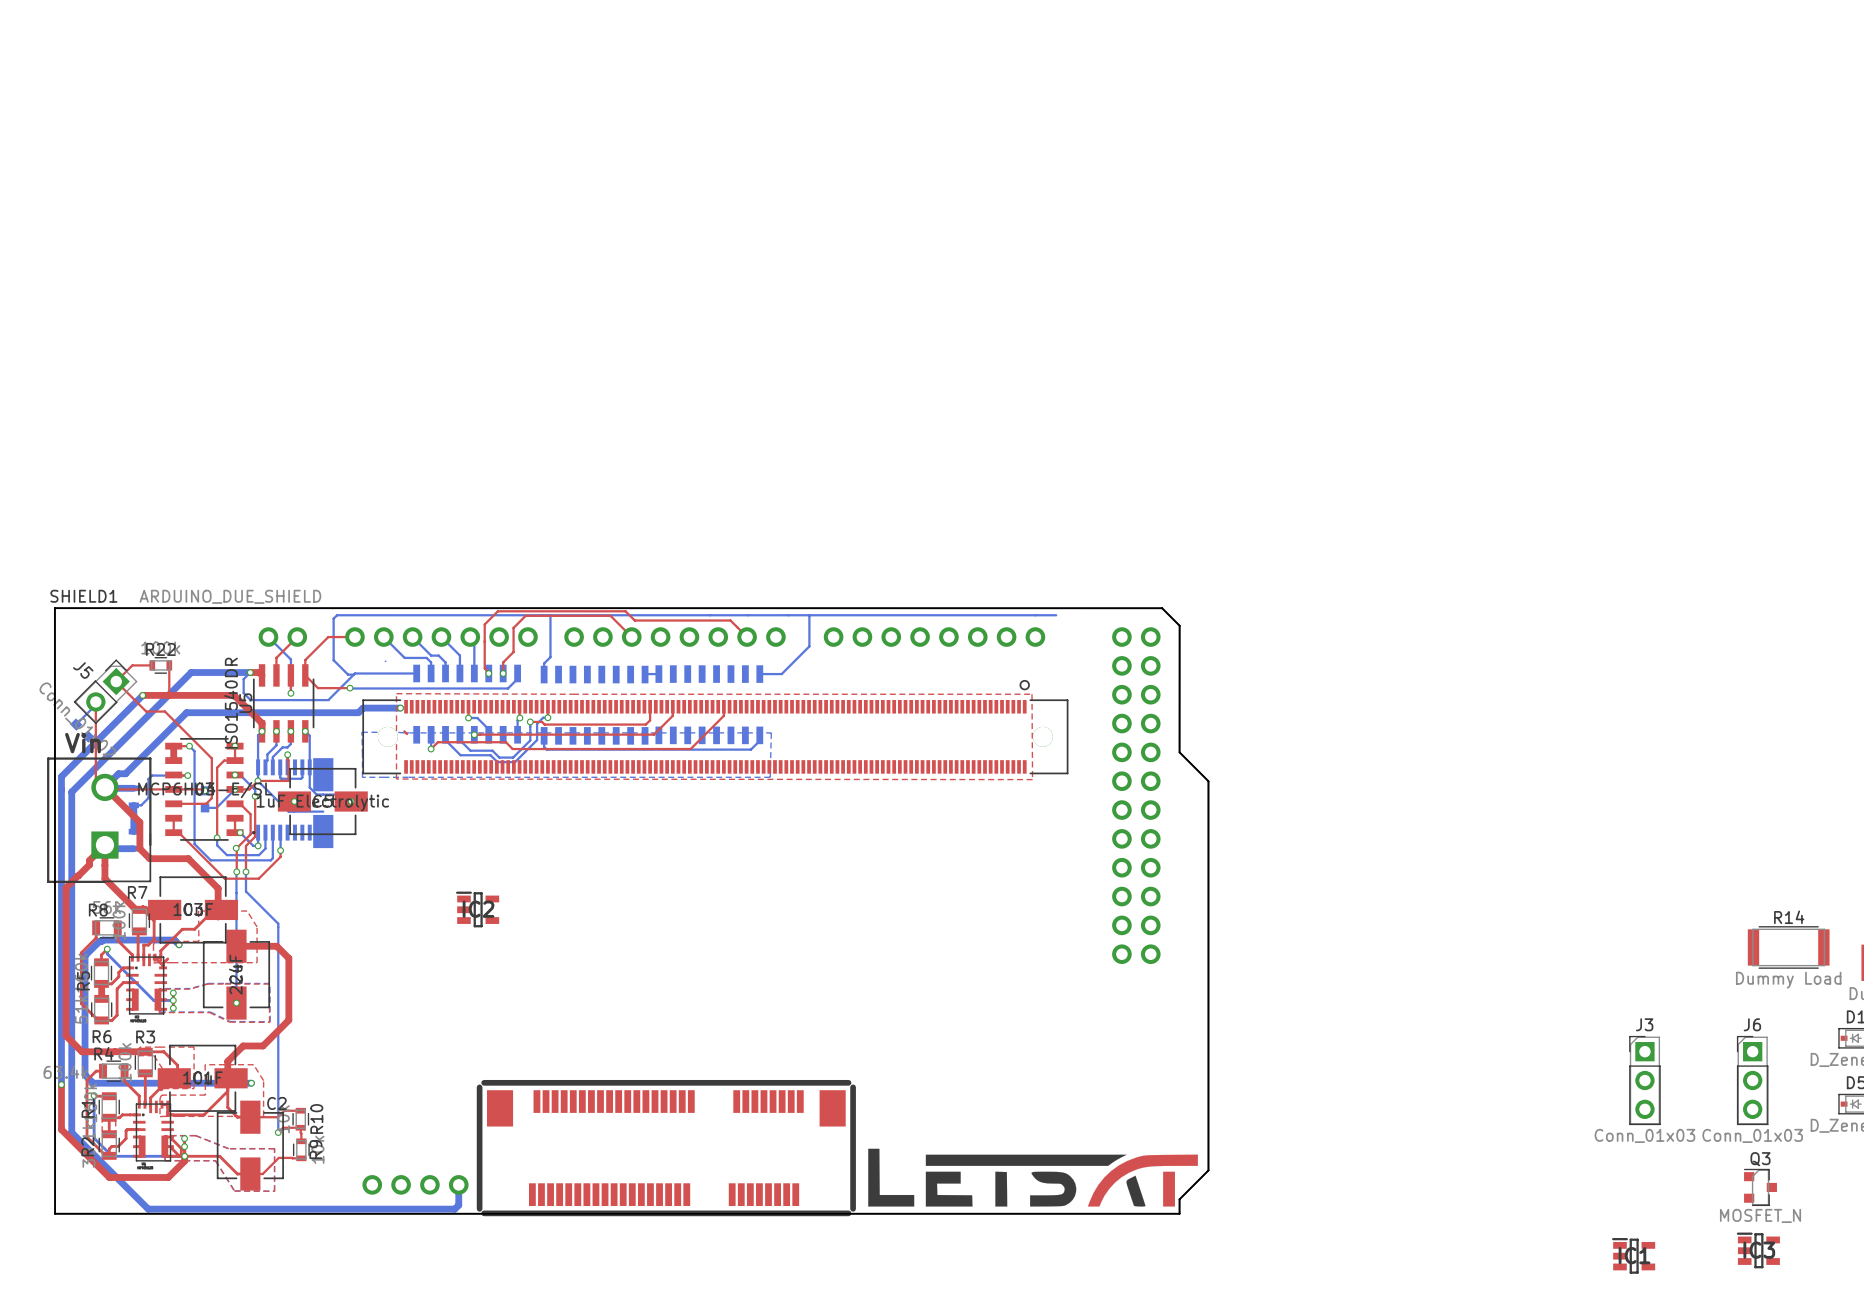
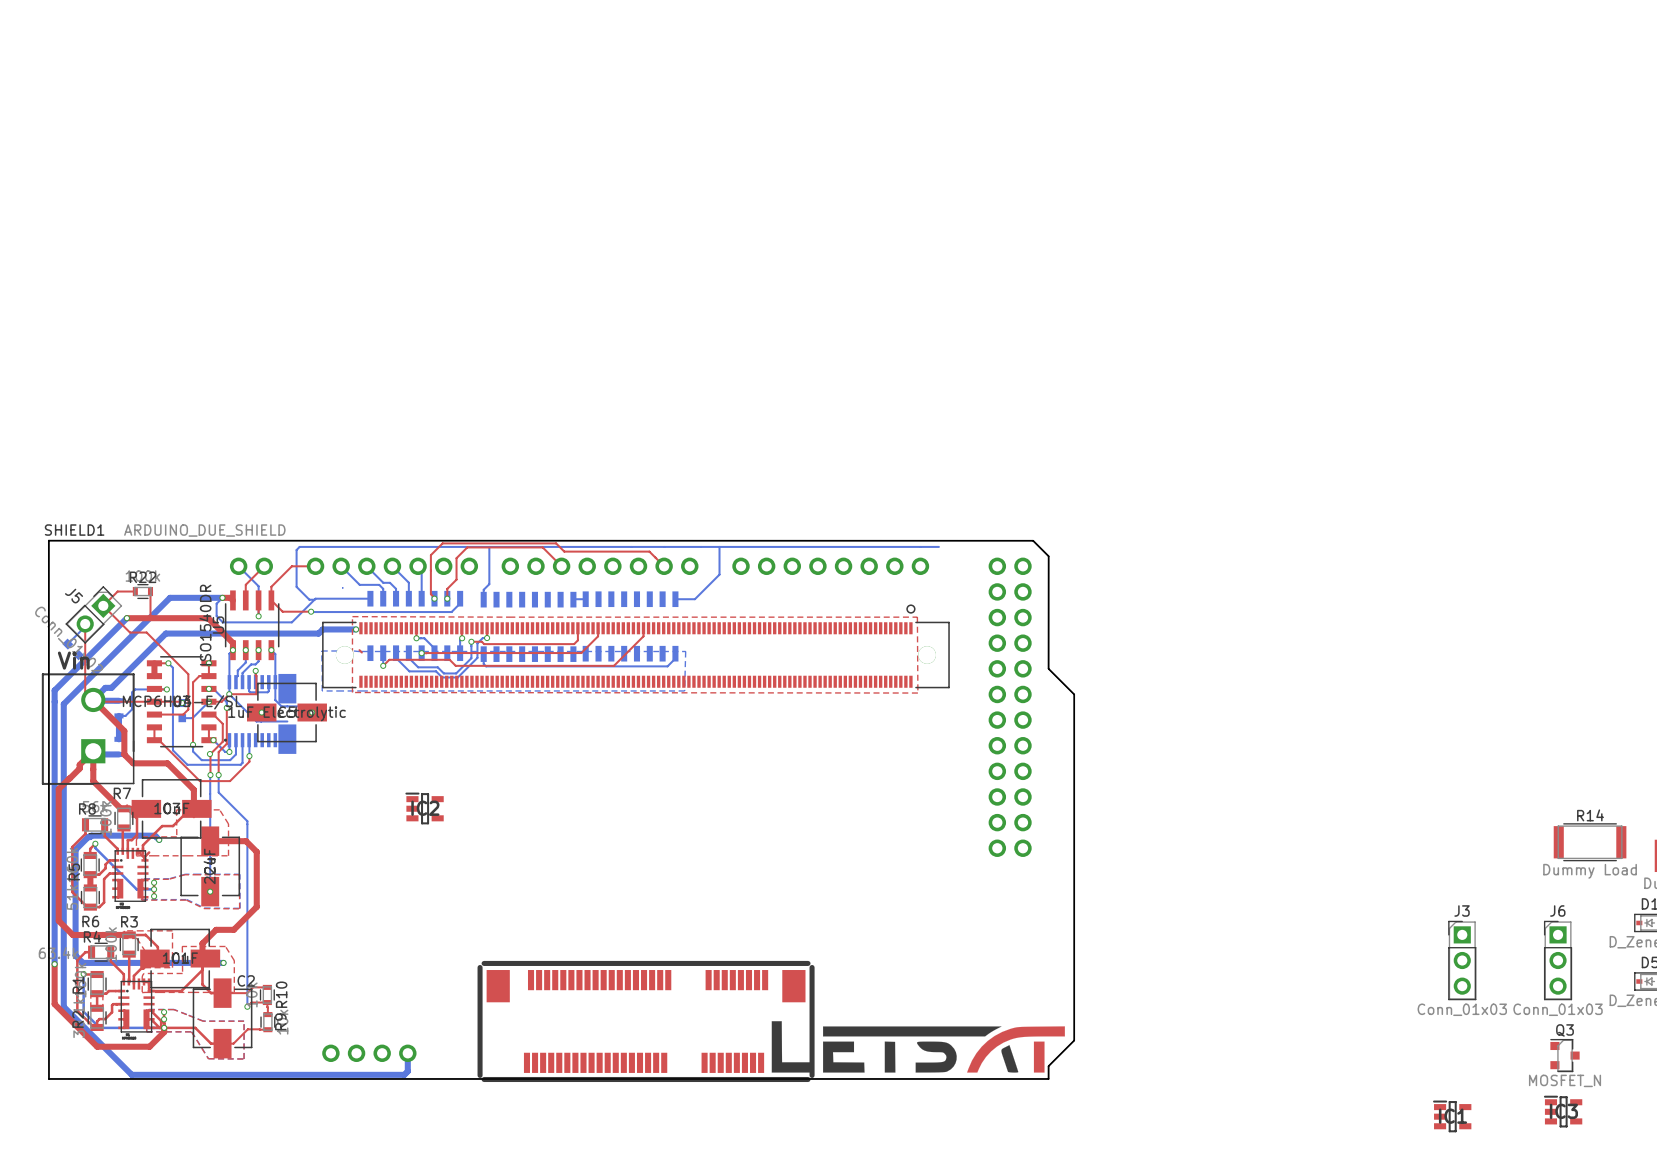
part position: (666, 1148) -> (646, 1021)

